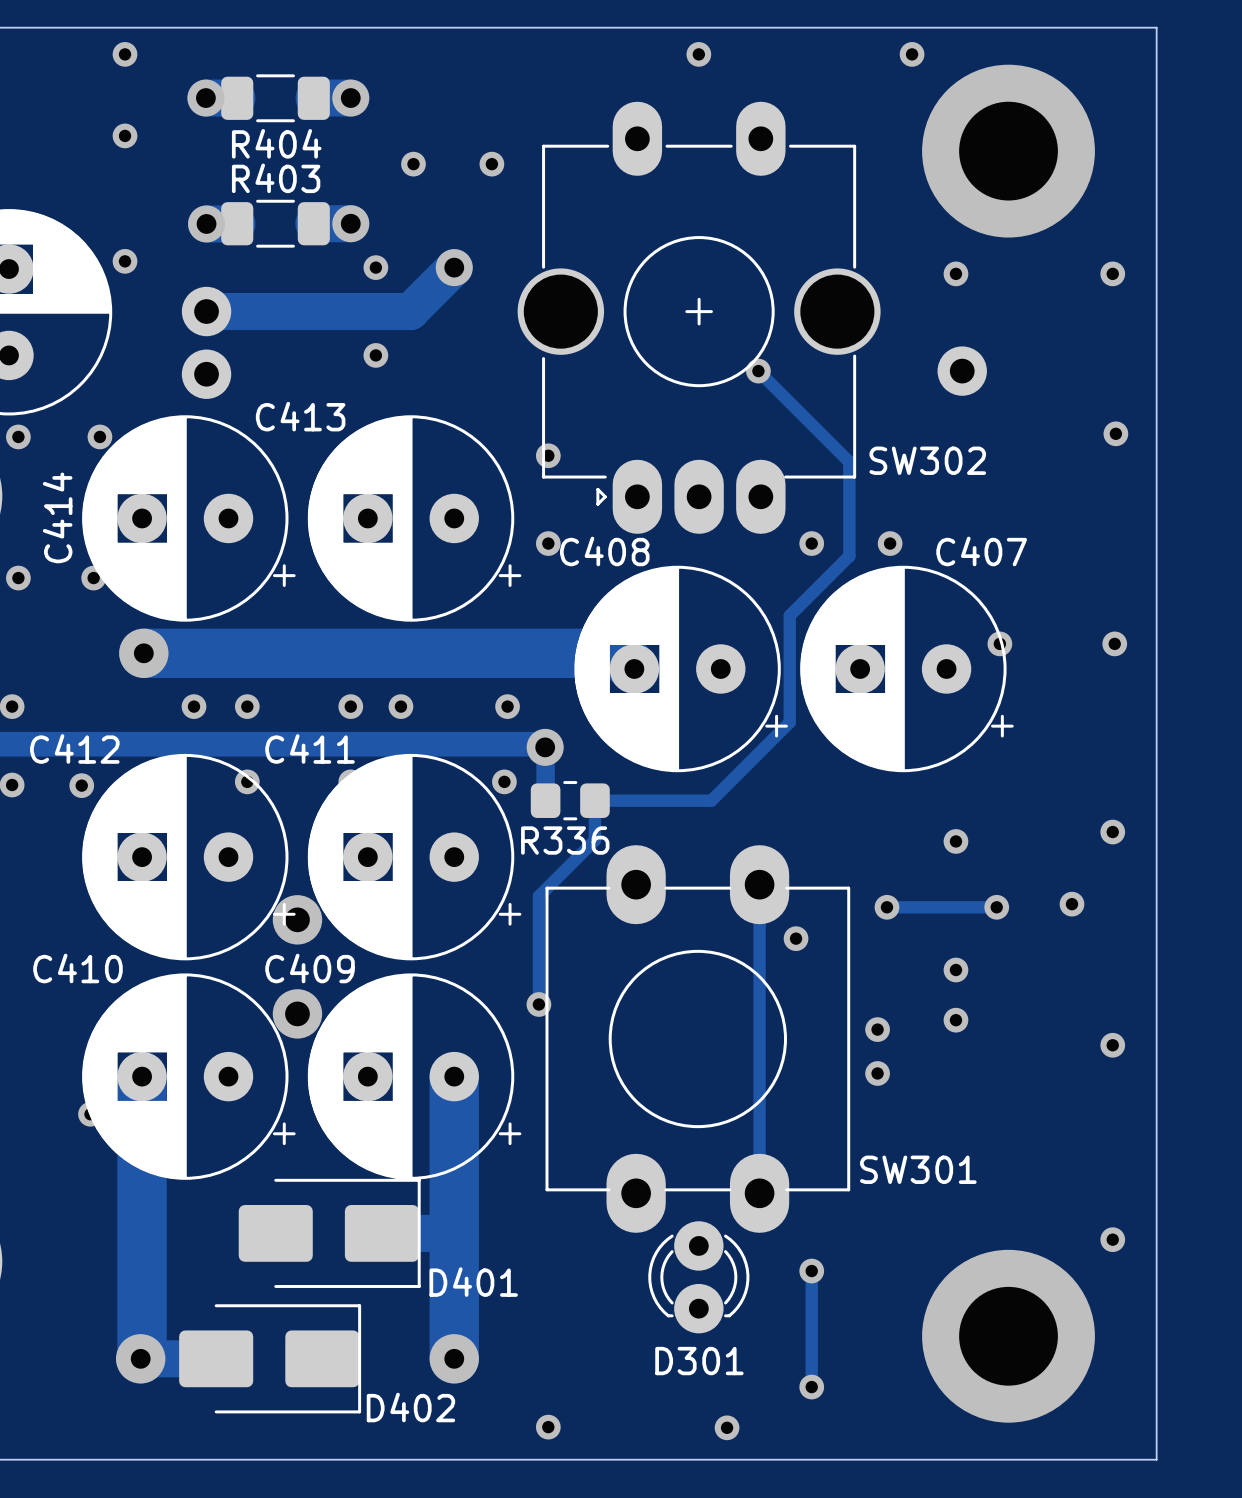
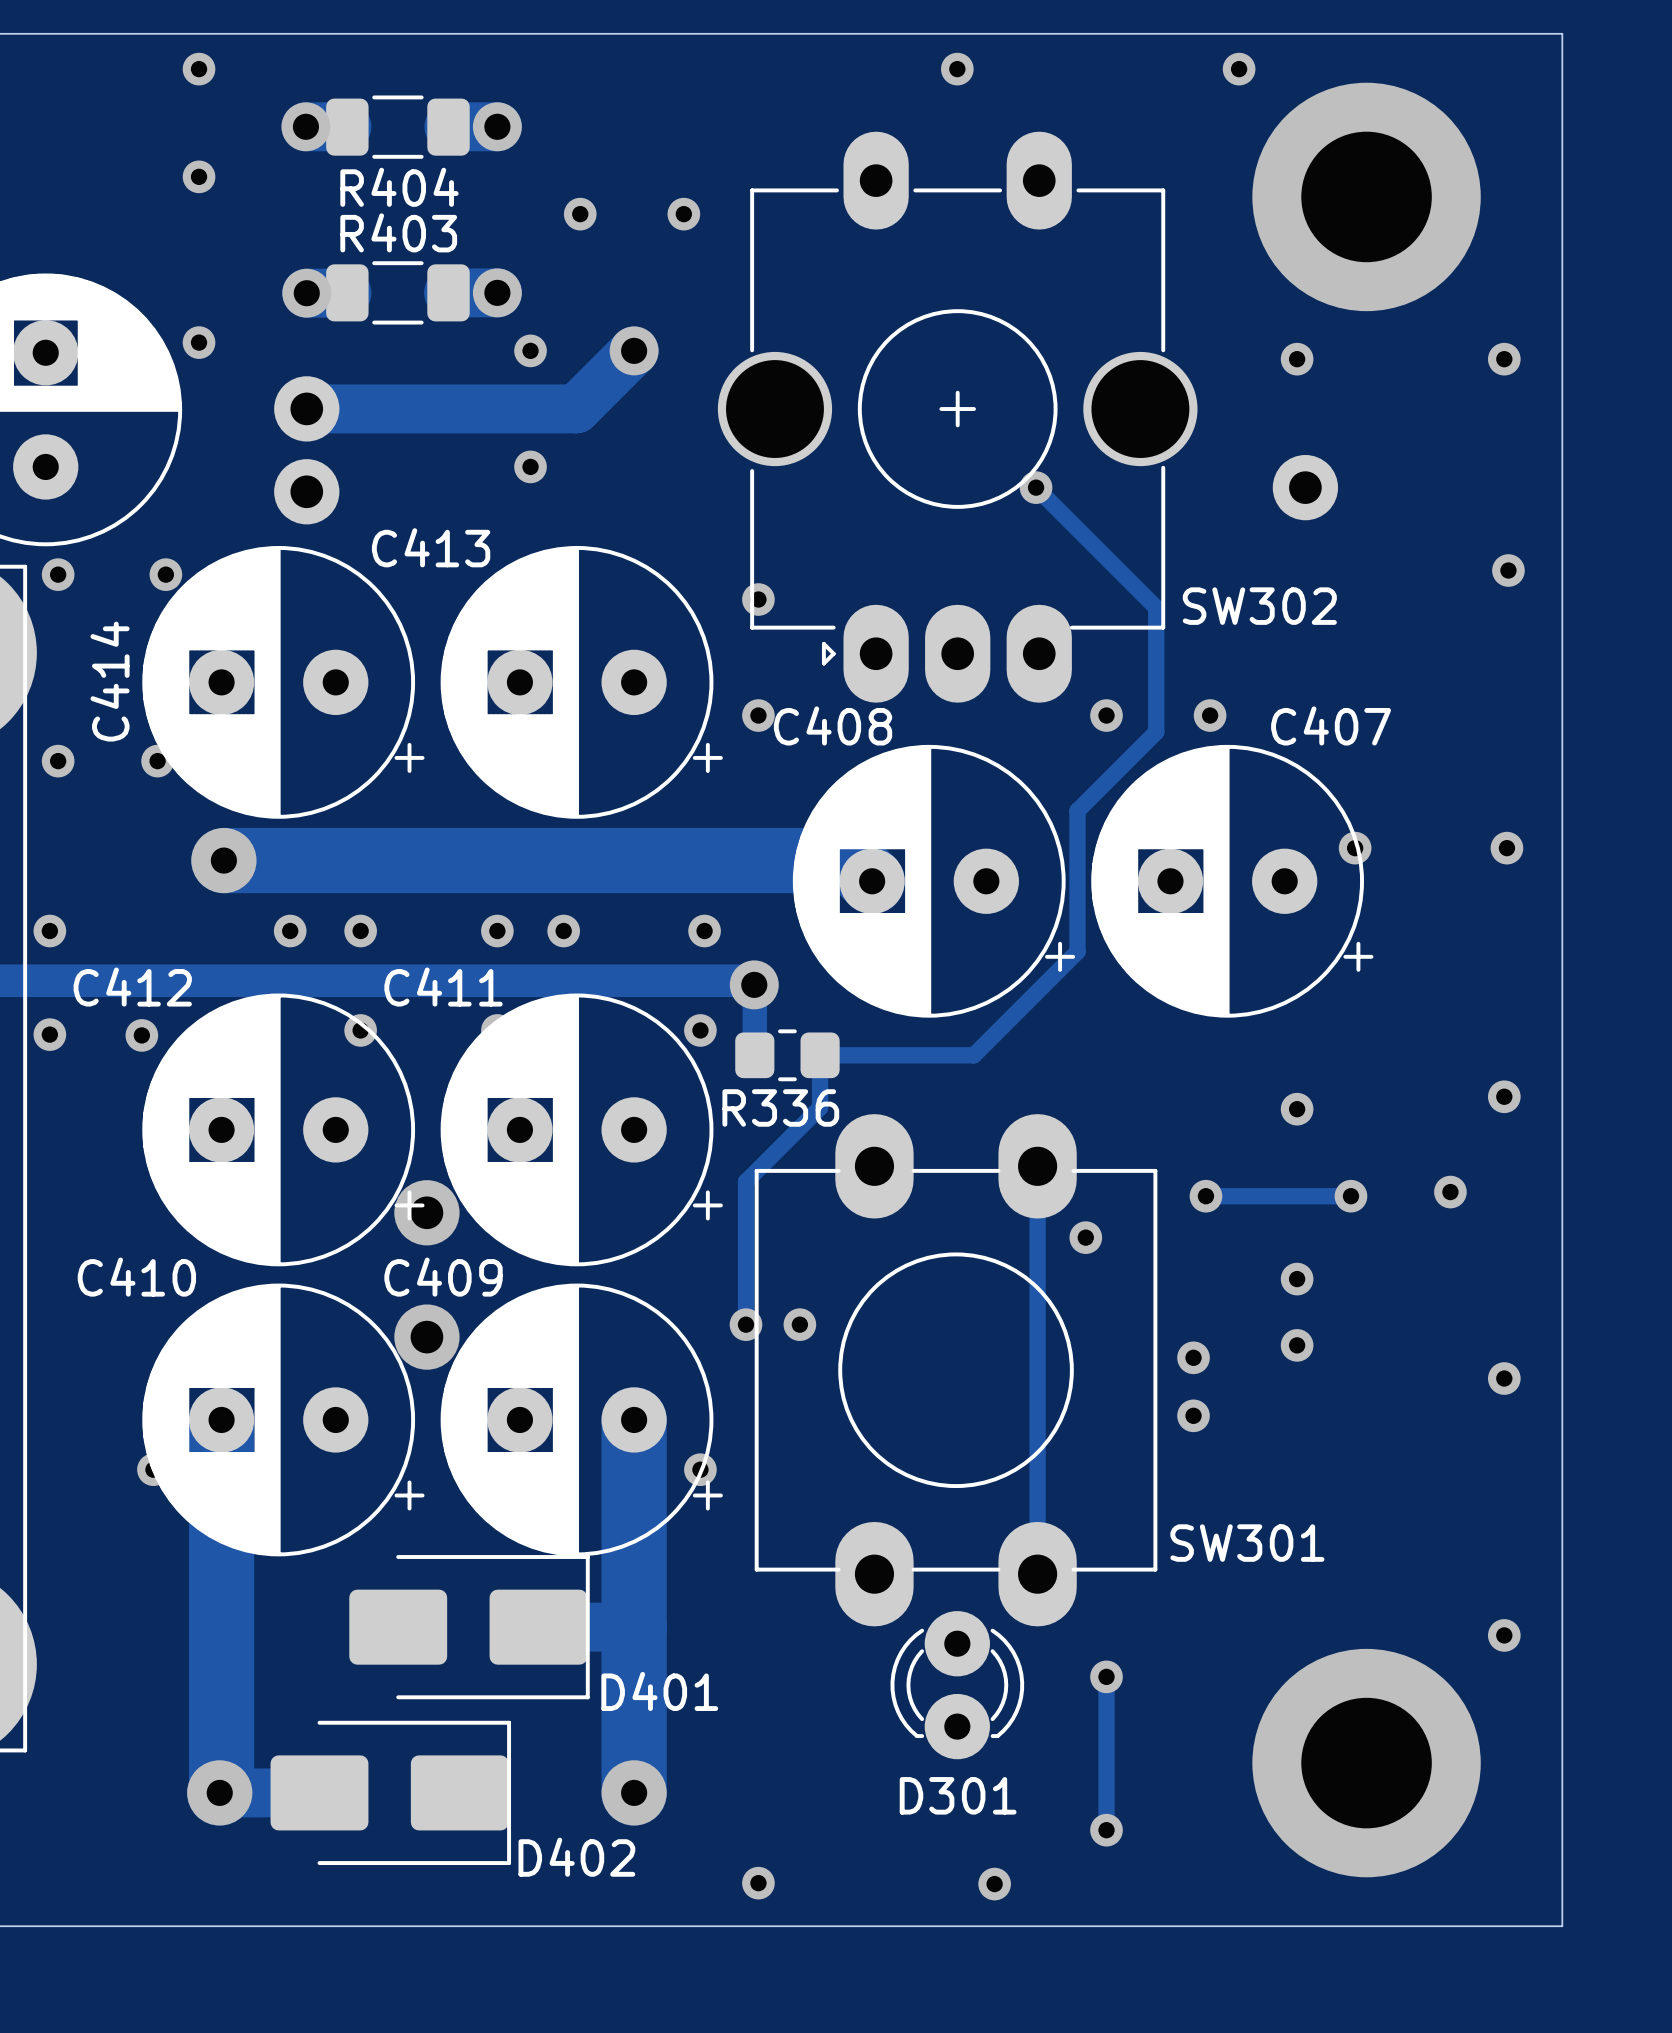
via: none -> (799, 1324)
via: none -> (700, 1469)

